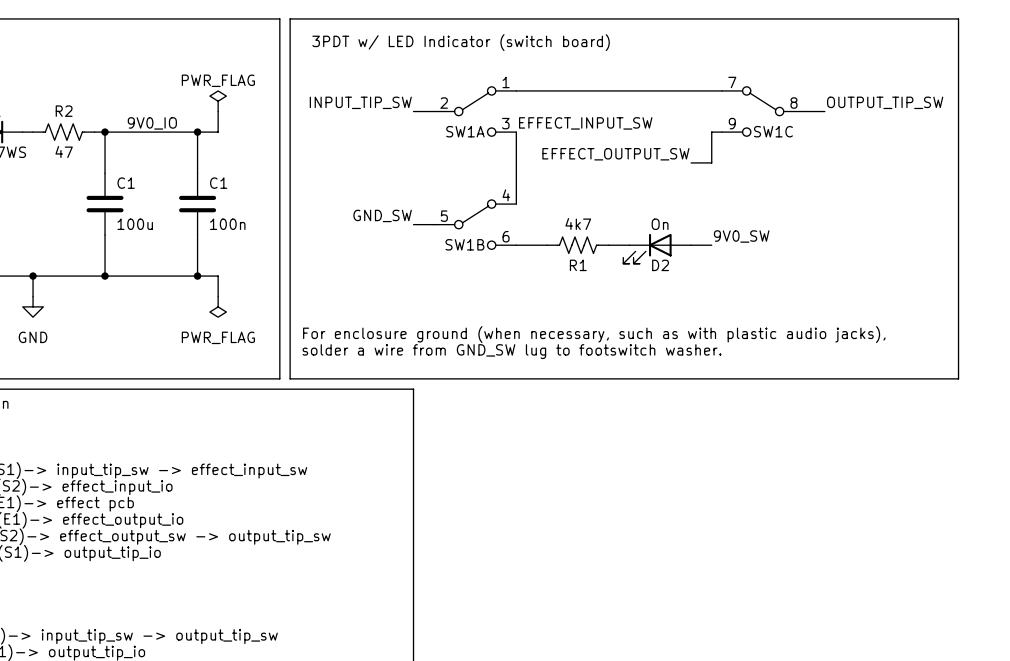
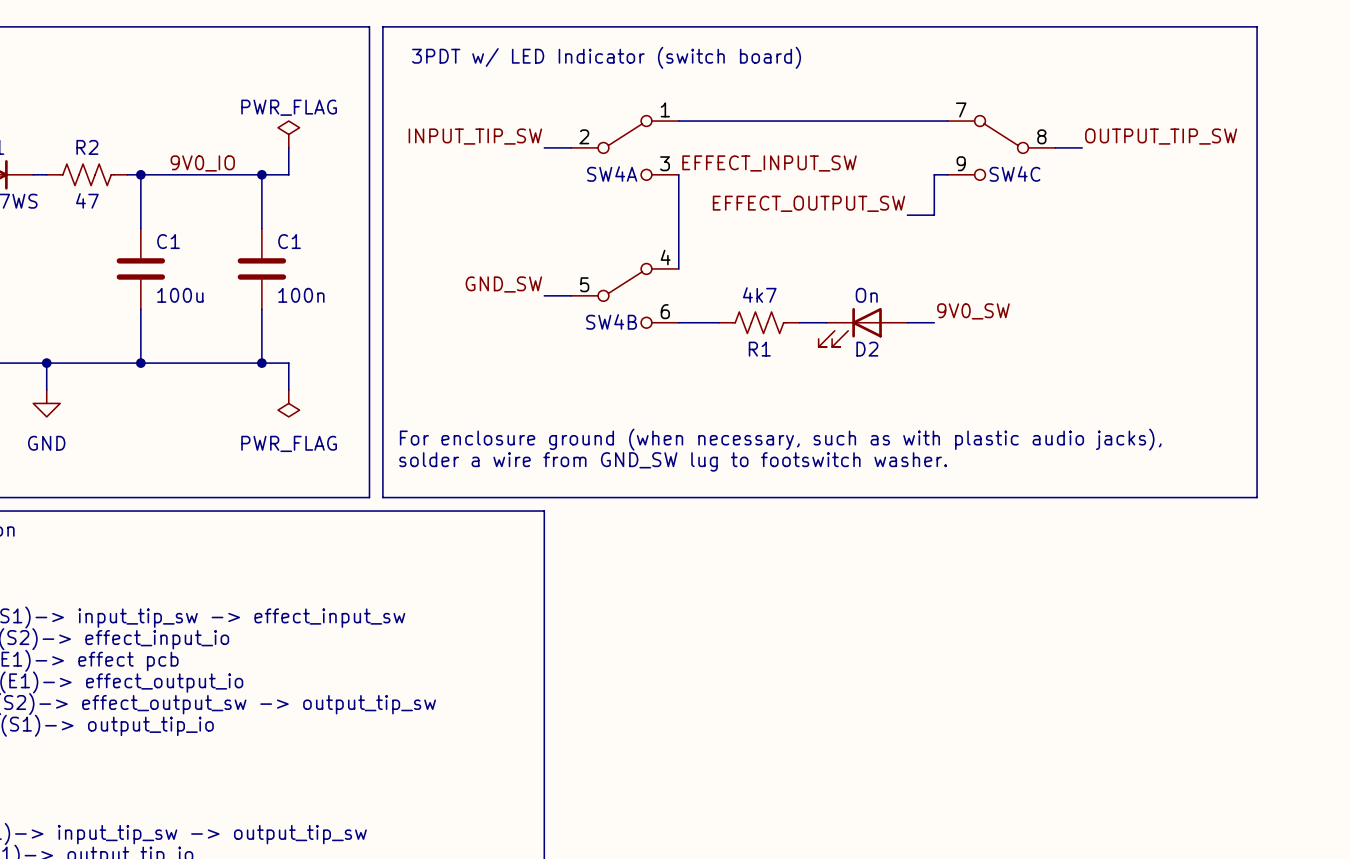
SW1A name: SW1A (465, 131) -> SW4A (612, 174)
SW1C name: SW1C (773, 131) -> SW4C (1014, 174)
SW1B name: SW1B (464, 244) -> SW4B (611, 321)

